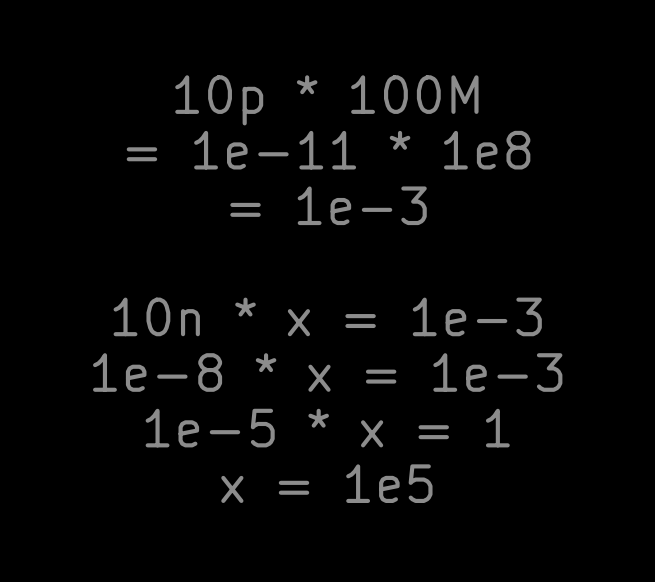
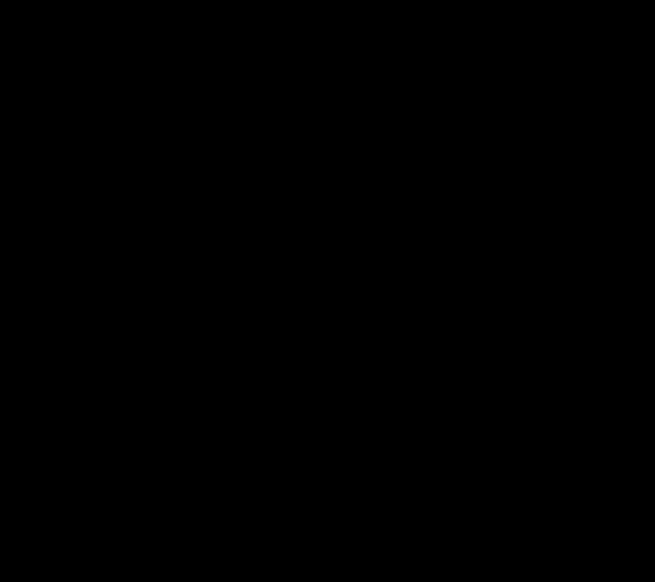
text: 10p * 100M (326, 100) -> none
text: = 1e-11 * 1e8 (328, 150) -> none
text: = 1e-3 (328, 205) -> none
text: 10n * x = 1e-3 (327, 316) -> none
text: 1e-8 * x = 1e-3 (327, 372) -> none
text: 1e-5 * x = 1 (327, 428) -> none
text: x = 1e5 (326, 483) -> none

